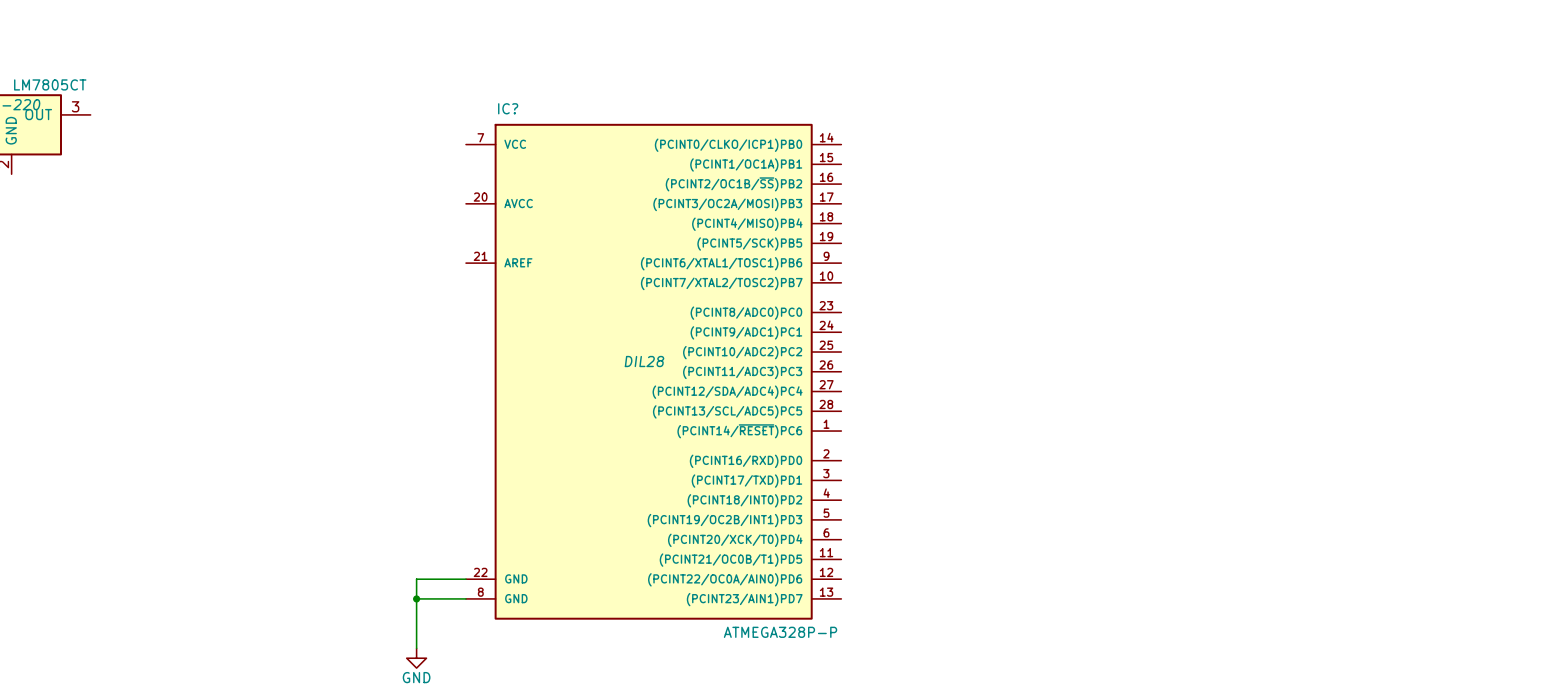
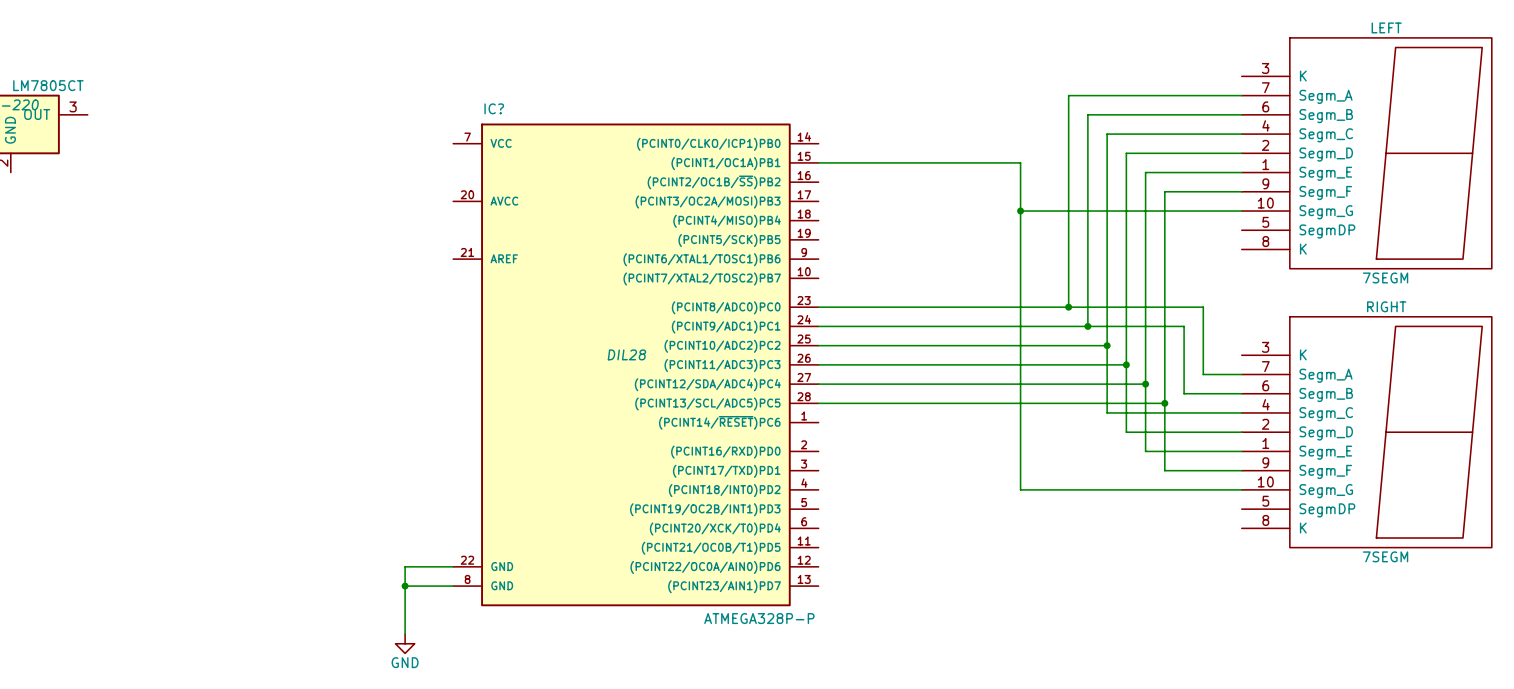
wire: none -> (1241, 95) (1068, 95) (1068, 307)
wire: none -> (1241, 114) (1087, 114) (1087, 326)
wire: none -> (1241, 134) (1107, 134) (1107, 412) (1241, 412)
wire: none -> (1241, 153) (1126, 153) (1126, 432) (1241, 432)
LEFT: none -> 7SEGM (1366, 153)
wire: none -> (818, 162) (1020, 162) (1020, 489) (1241, 489)
wire: none -> (1241, 172) (1145, 172) (1145, 451) (1241, 451)
wire: none -> (1241, 191) (1164, 191) (1164, 470) (1241, 470)
wire: none -> (1020, 211) (1241, 211)
junction: none -> (1020, 211)
wire: none -> (818, 307) (1203, 307) (1203, 374) (1241, 374)
junction: none -> (1068, 307)
wire: none -> (818, 326) (1184, 326) (1184, 393) (1241, 393)
junction: none -> (1087, 326)
wire: none -> (818, 345) (1107, 345)
junction: none -> (1107, 345)
wire: none -> (818, 364) (1126, 364)
junction: none -> (1126, 364)
wire: none -> (818, 384) (1145, 384)
junction: none -> (1145, 384)
wire: none -> (818, 403) (1164, 403)
junction: none -> (1164, 403)
RIGHT: none -> 7SEGM (1366, 432)

